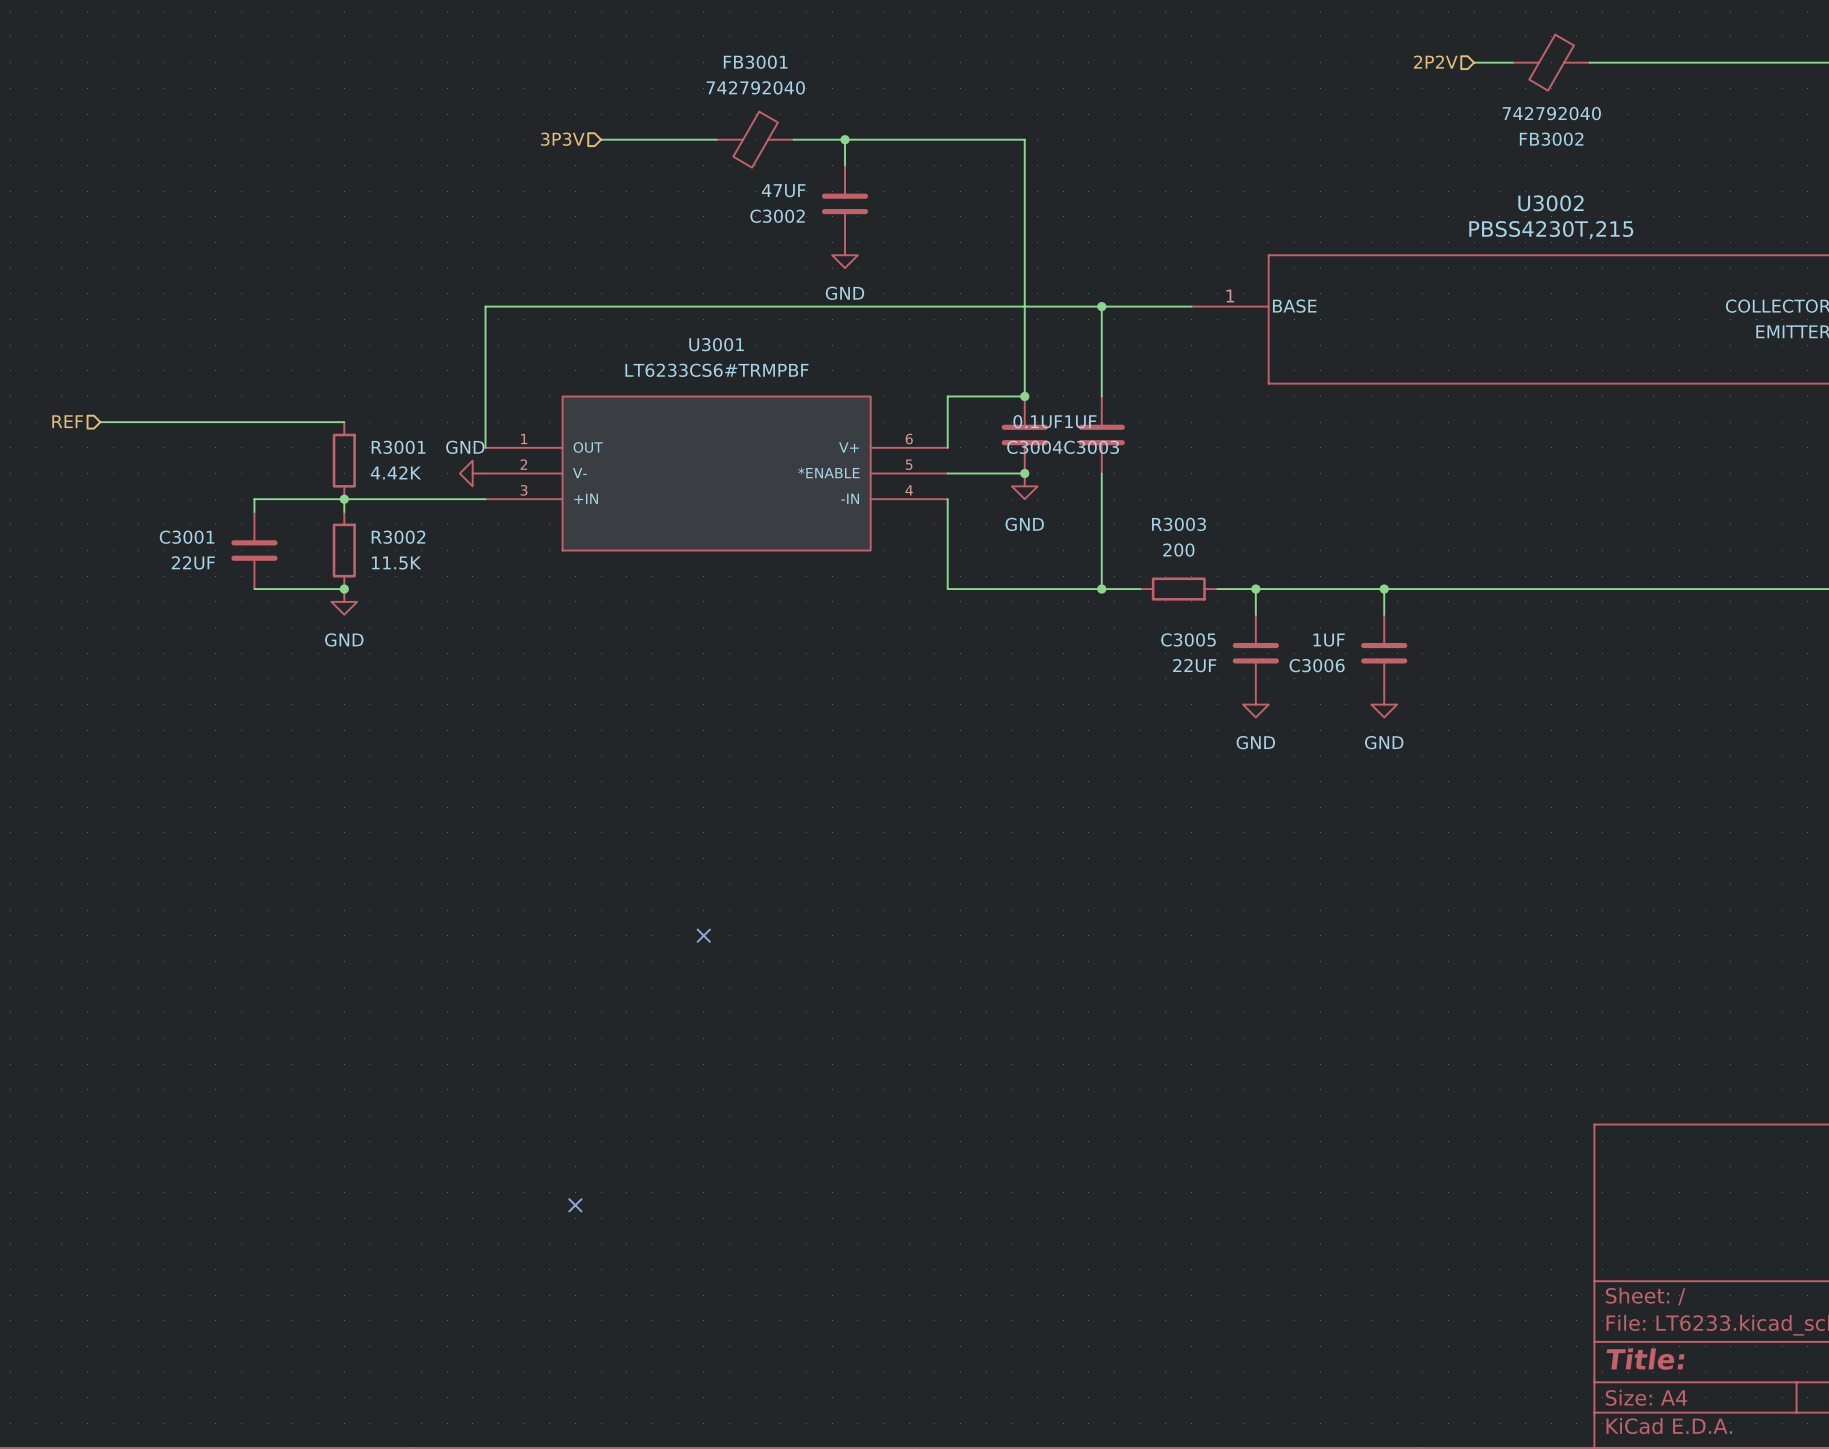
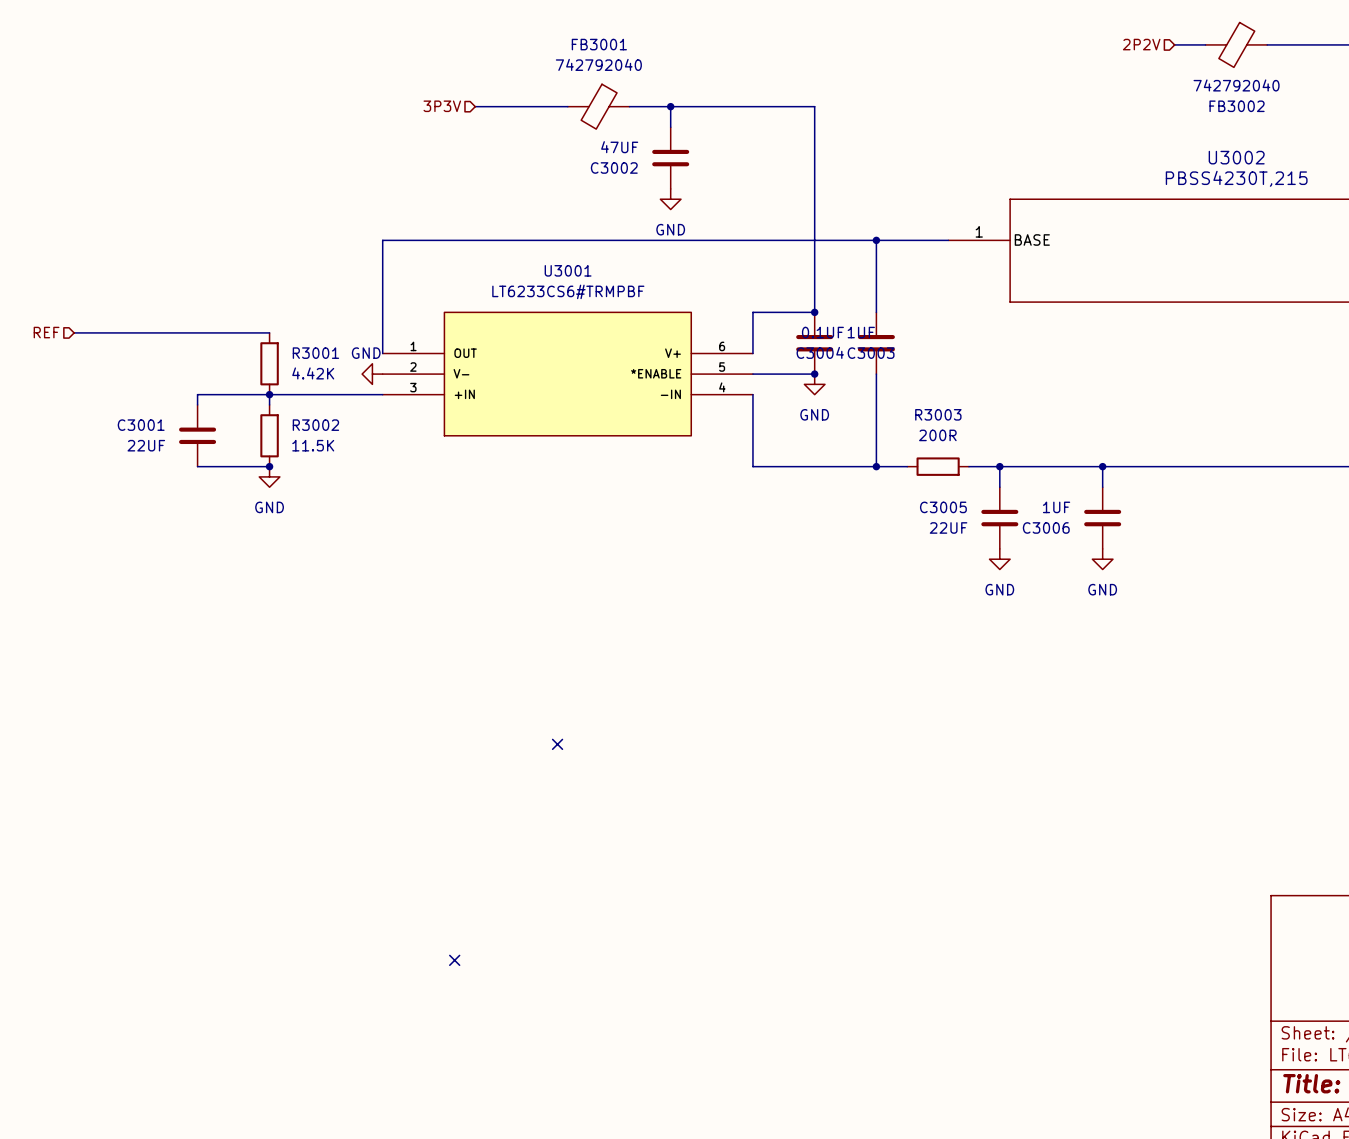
R3003 value: 200 (1178, 550) -> 200R (937, 435)

